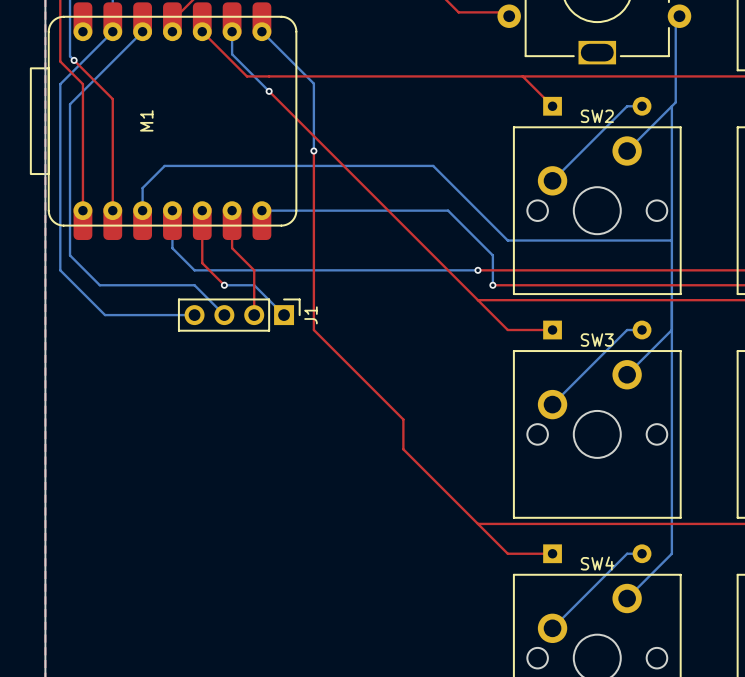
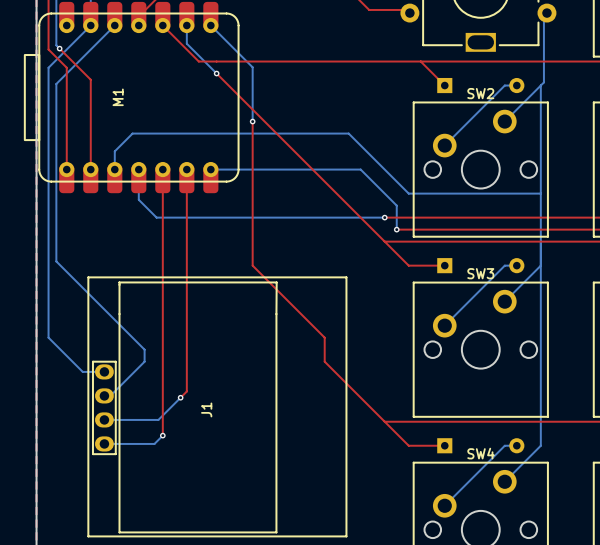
top track: (232, 248) (254, 270) (254, 315) -> (186, 199) (186, 391) (180, 397)
bottom track: (70, 255) (99, 285) (194, 285) (224, 315) -> (56, 205) (56, 261) (144, 349) (144, 361) (110, 395) (104, 395)
top track: (202, 263) (224, 285) -> (162, 211) (162, 435)
bottom track: (60, 270) (105, 315) (194, 315) -> (48, 217) (48, 337) (82, 371) (104, 371)
bottom track: (224, 285) (254, 285) (284, 315) -> none
via: (224, 285) -> none
J1 footprint: [178, 298, 301, 332] -> [87, 276, 348, 537]
J1 name position: J1 (310, 315) -> J1 (206, 409)
bottom track: none -> (180, 397) (158, 419) (104, 419)
via: none -> (180, 397)
bottom track: none -> (162, 435) (154, 443) (104, 443)
via: none -> (162, 435)

